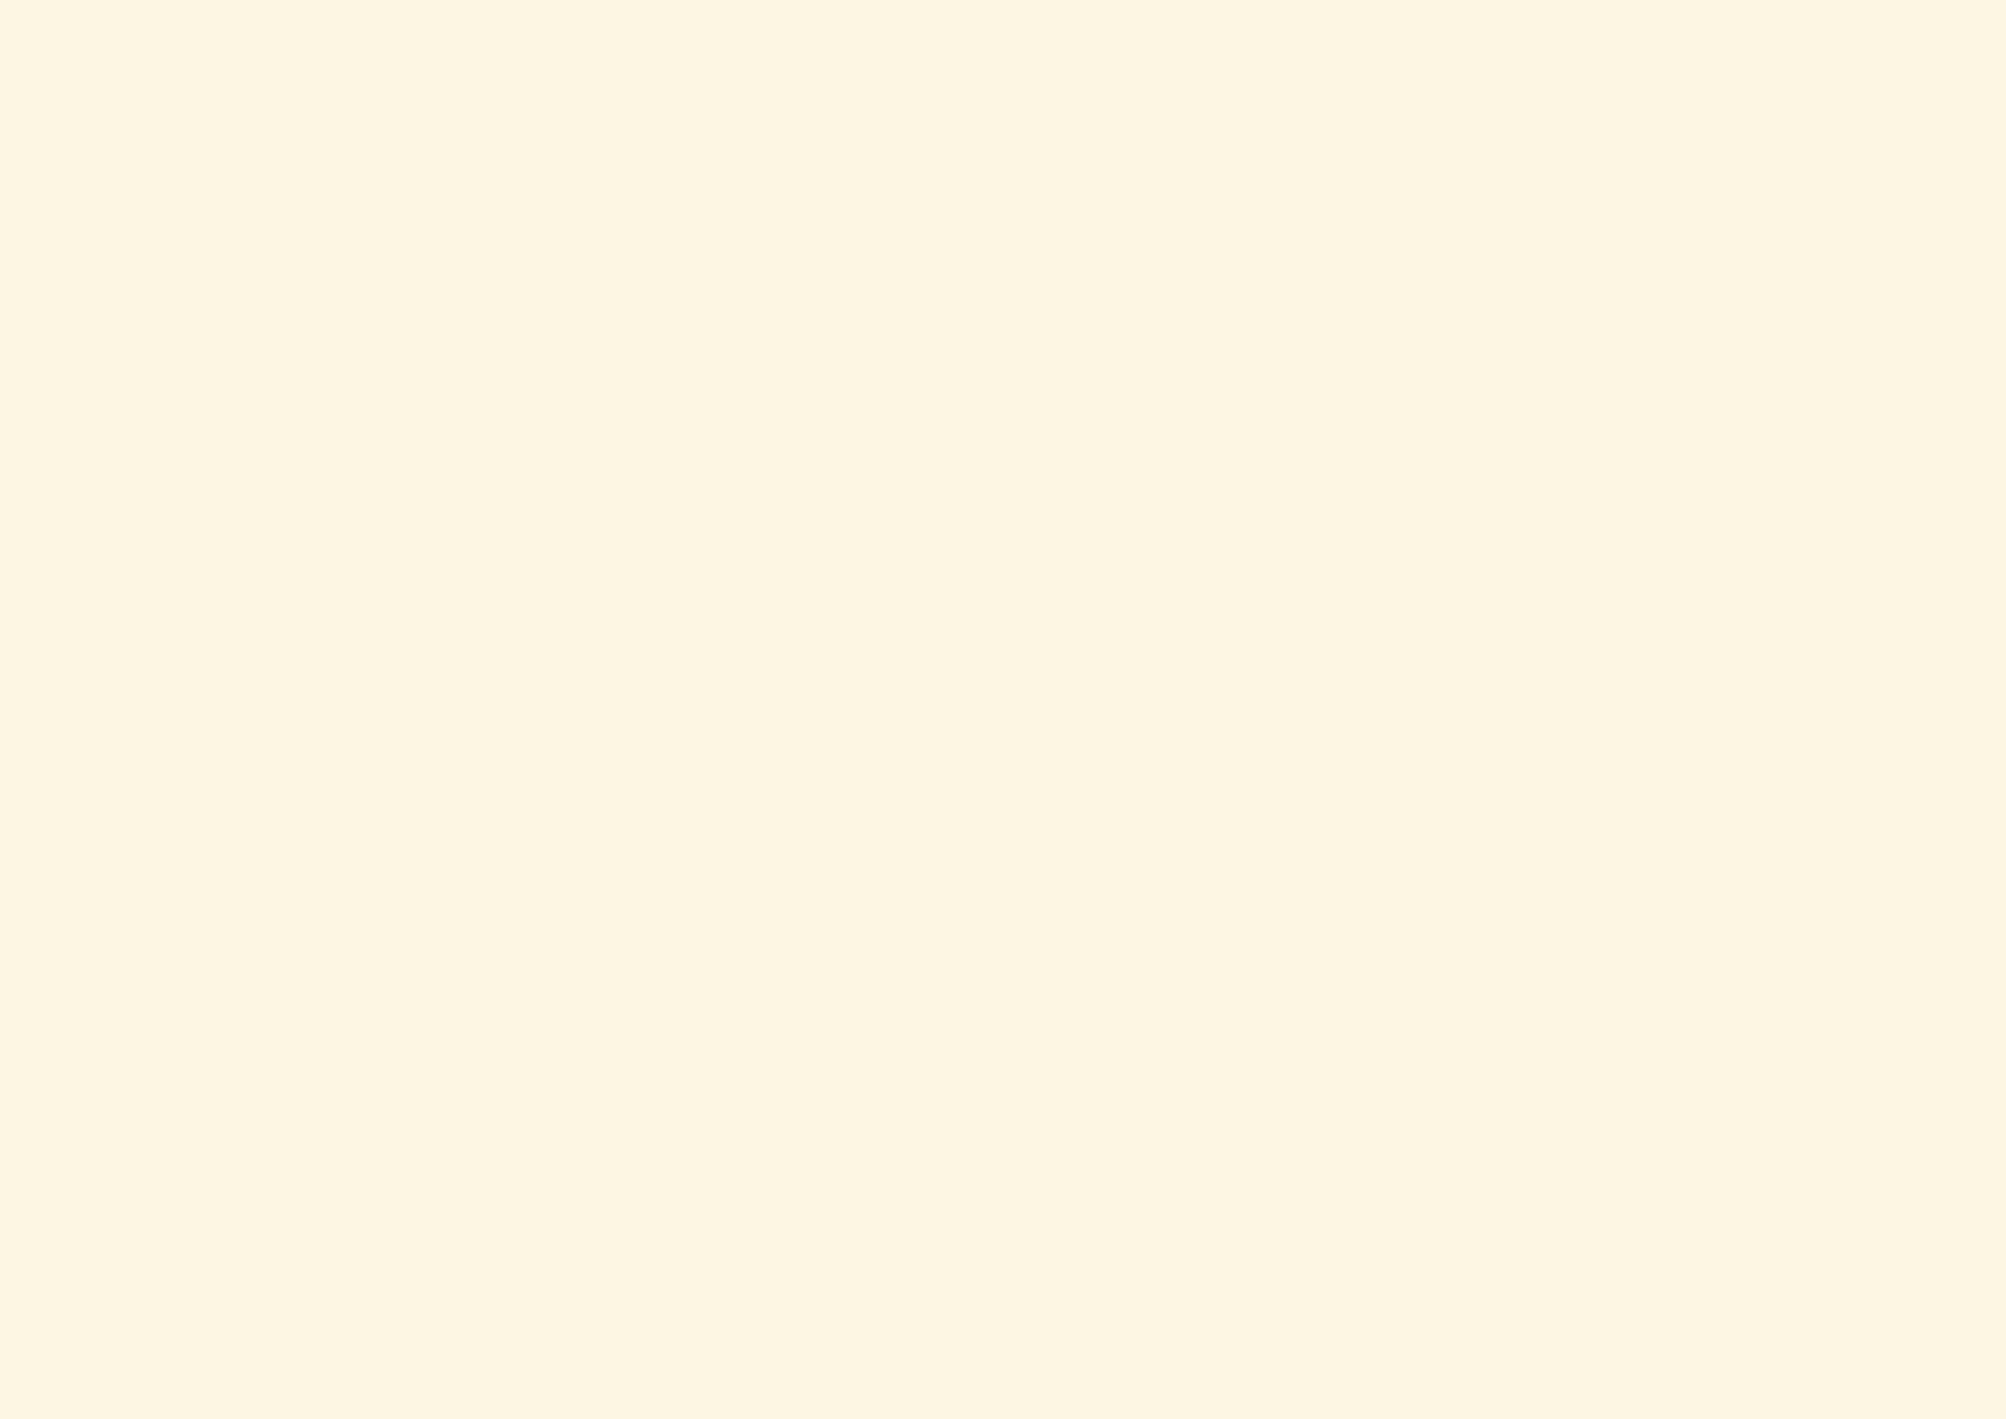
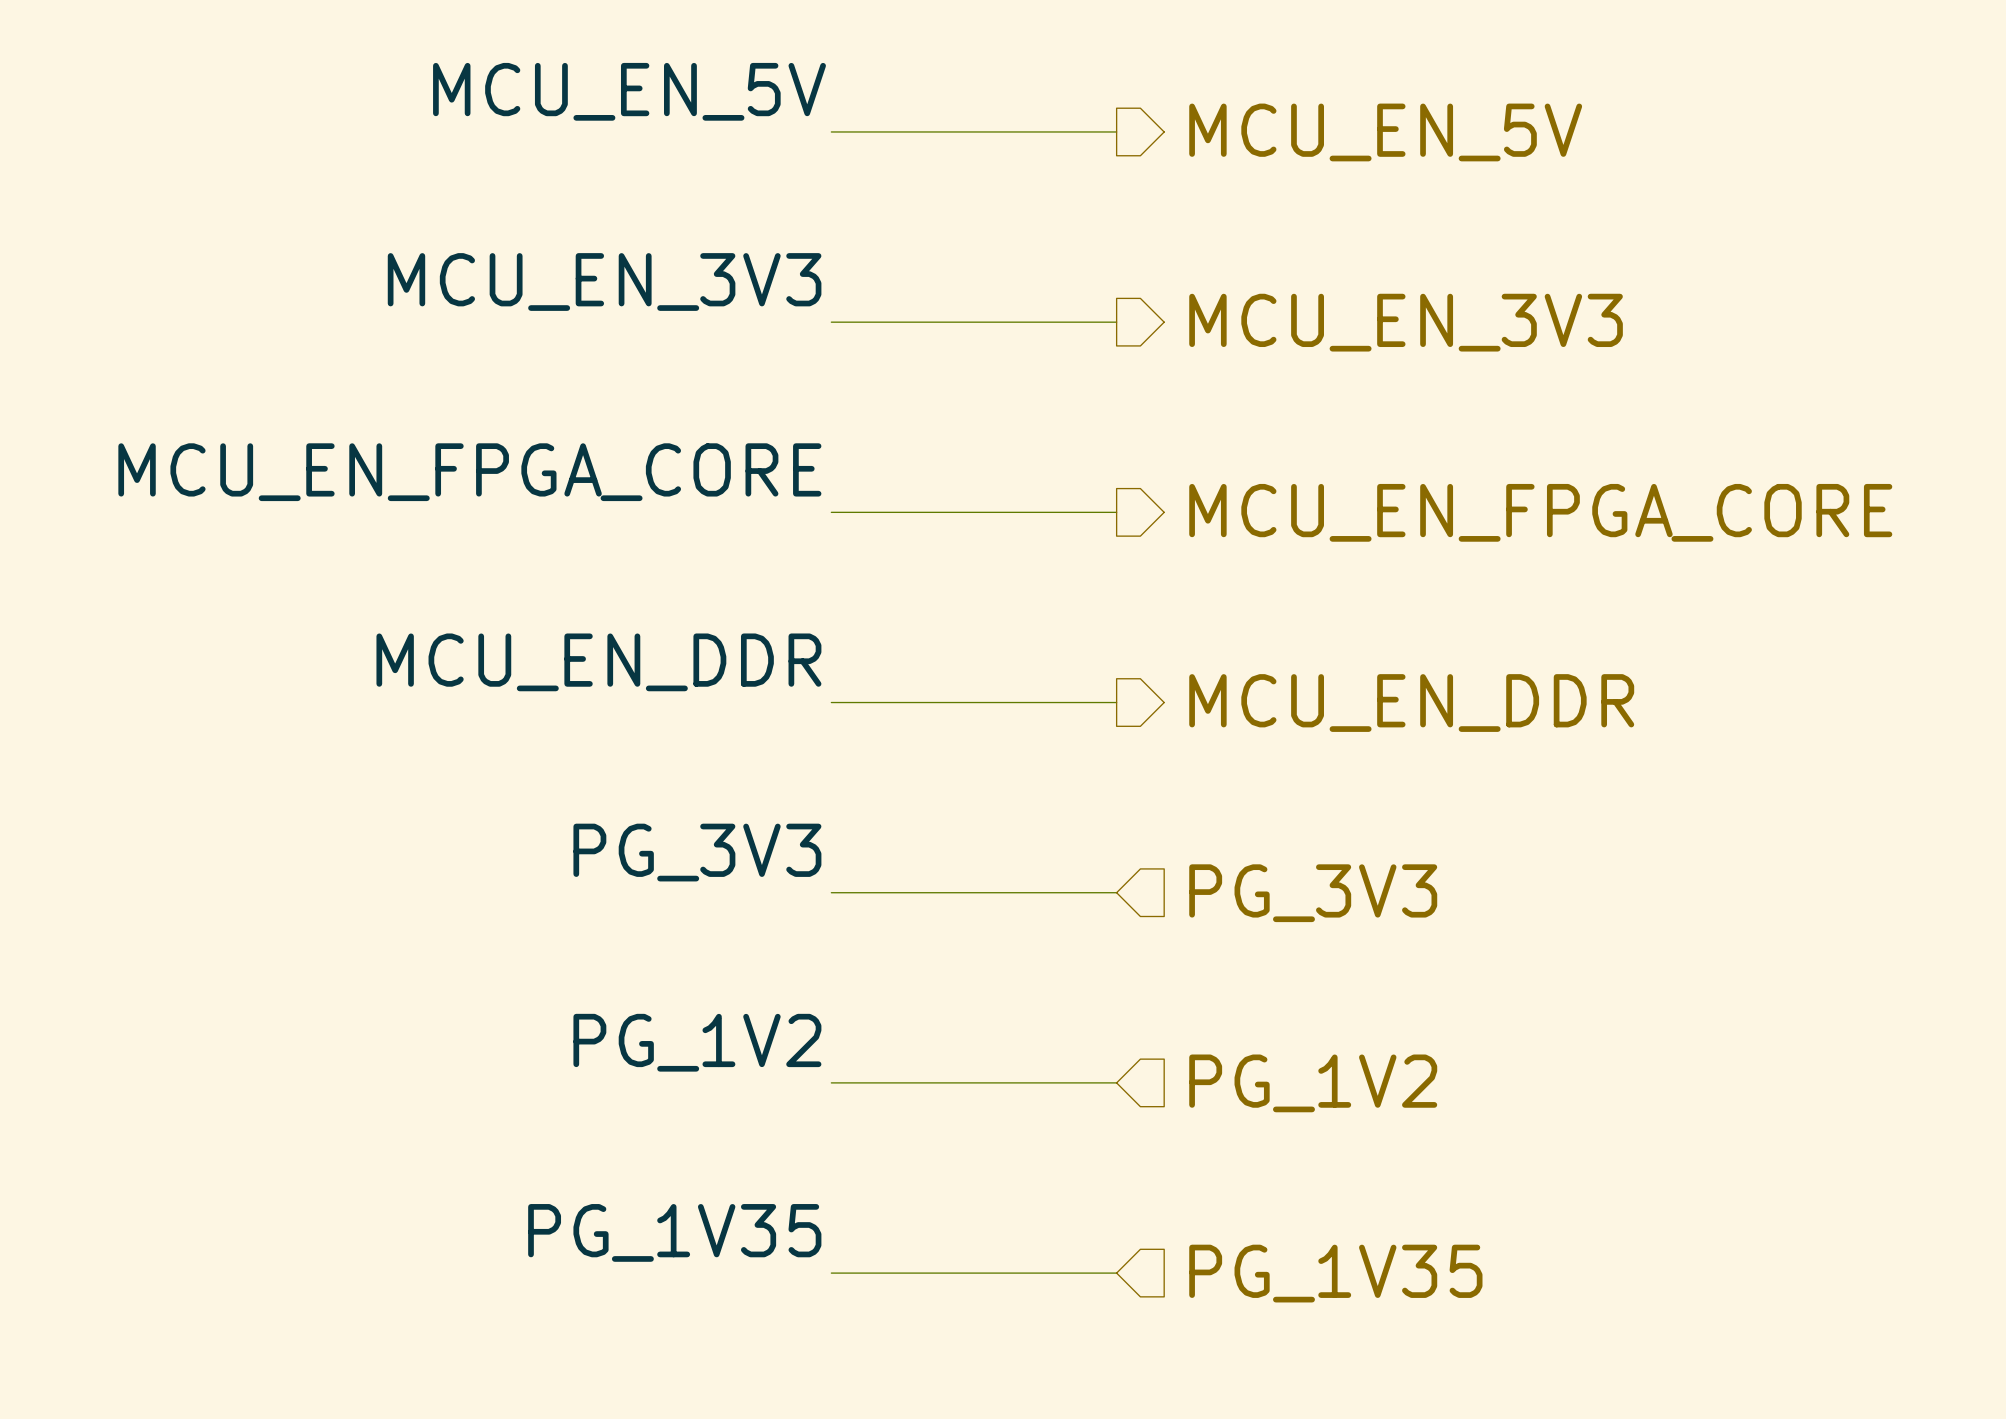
label: none -> MCU_EN_5V (629, 91)
wire: none -> (831, 131) (1116, 131)
hierarchical label: none -> MCU_EN_5V (1385, 132)
label: none -> MCU_EN_3V3 (604, 282)
wire: none -> (831, 322) (1116, 322)
hierarchical label: none -> MCU_EN_3V3 (1406, 322)
label: none -> MCU_EN_FPGA_CORE (469, 472)
wire: none -> (831, 512) (1116, 512)
hierarchical label: none -> MCU_EN_FPGA_CORE (1540, 512)
label: none -> MCU_EN_DDR (598, 662)
wire: none -> (831, 702) (1116, 702)
hierarchical label: none -> MCU_EN_DDR (1411, 703)
label: none -> PG_3V3 (697, 852)
wire: none -> (831, 892) (1116, 892)
hierarchical label: none -> PG_3V3 (1313, 893)
label: none -> PG_1V2 (697, 1042)
wire: none -> (831, 1082) (1116, 1082)
hierarchical label: none -> PG_1V2 (1313, 1083)
label: none -> PG_1V35 (674, 1232)
wire: none -> (831, 1273) (1116, 1273)
hierarchical label: none -> PG_1V35 (1335, 1273)

